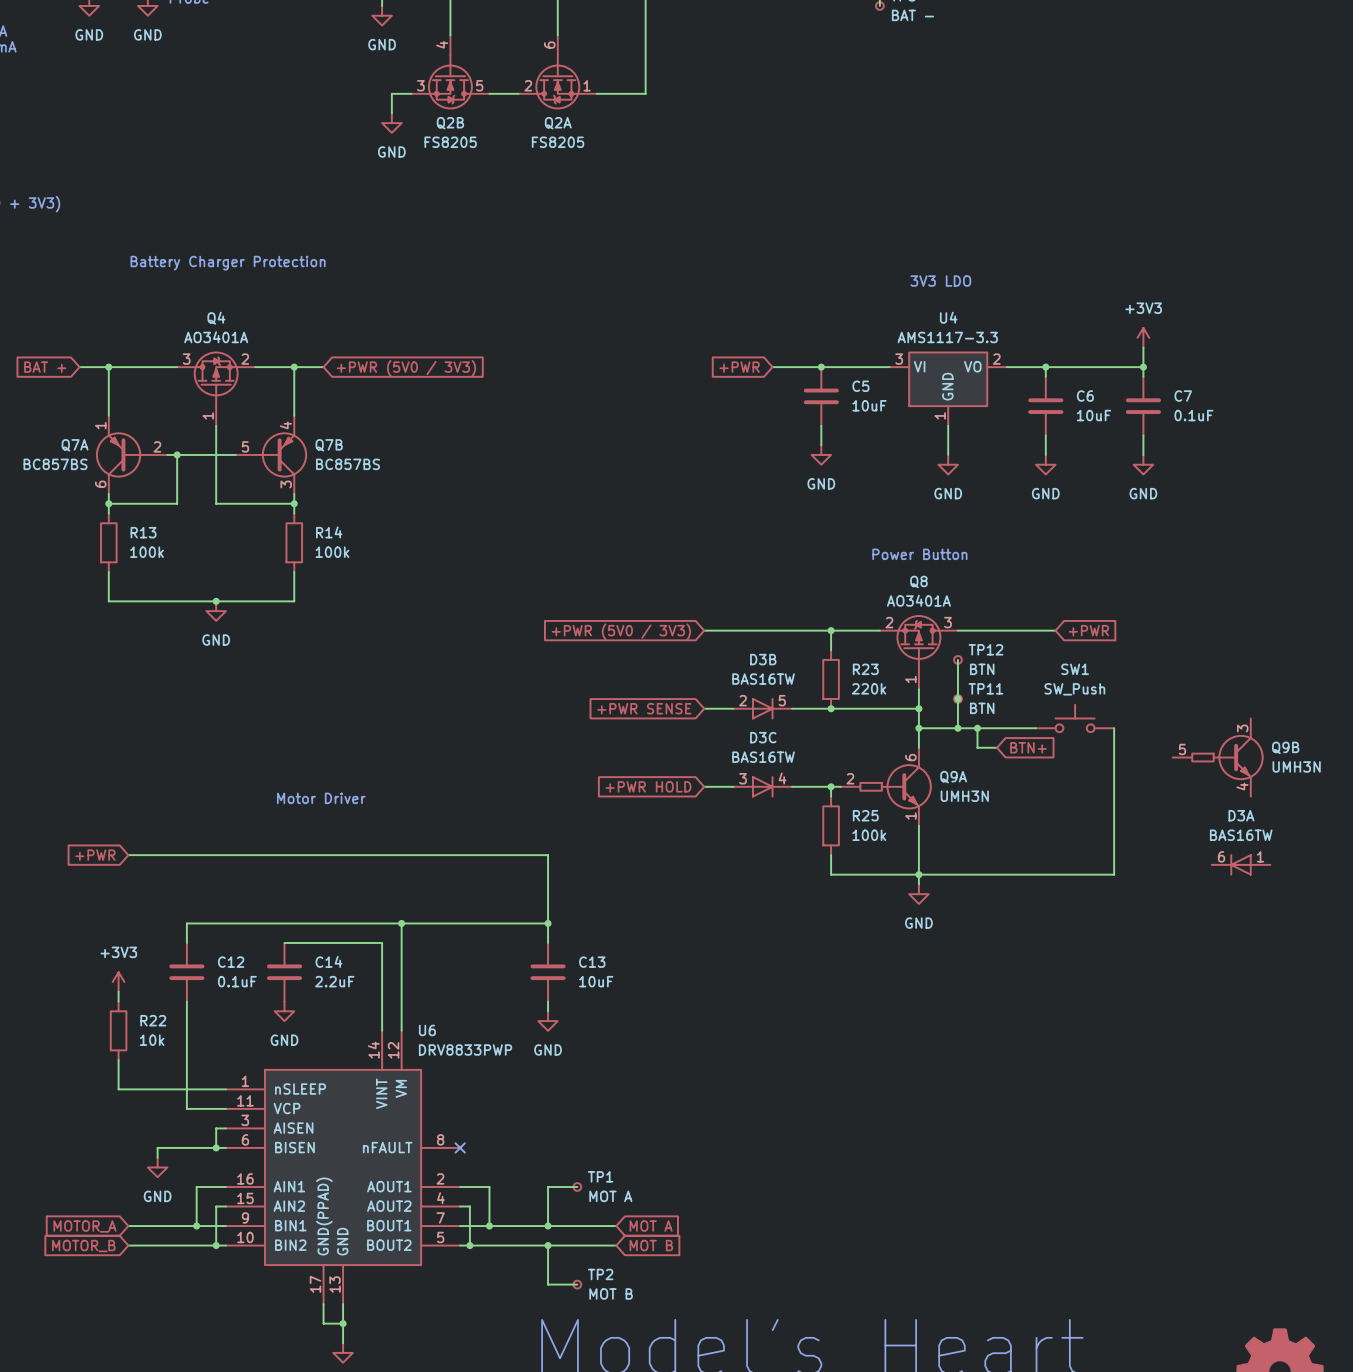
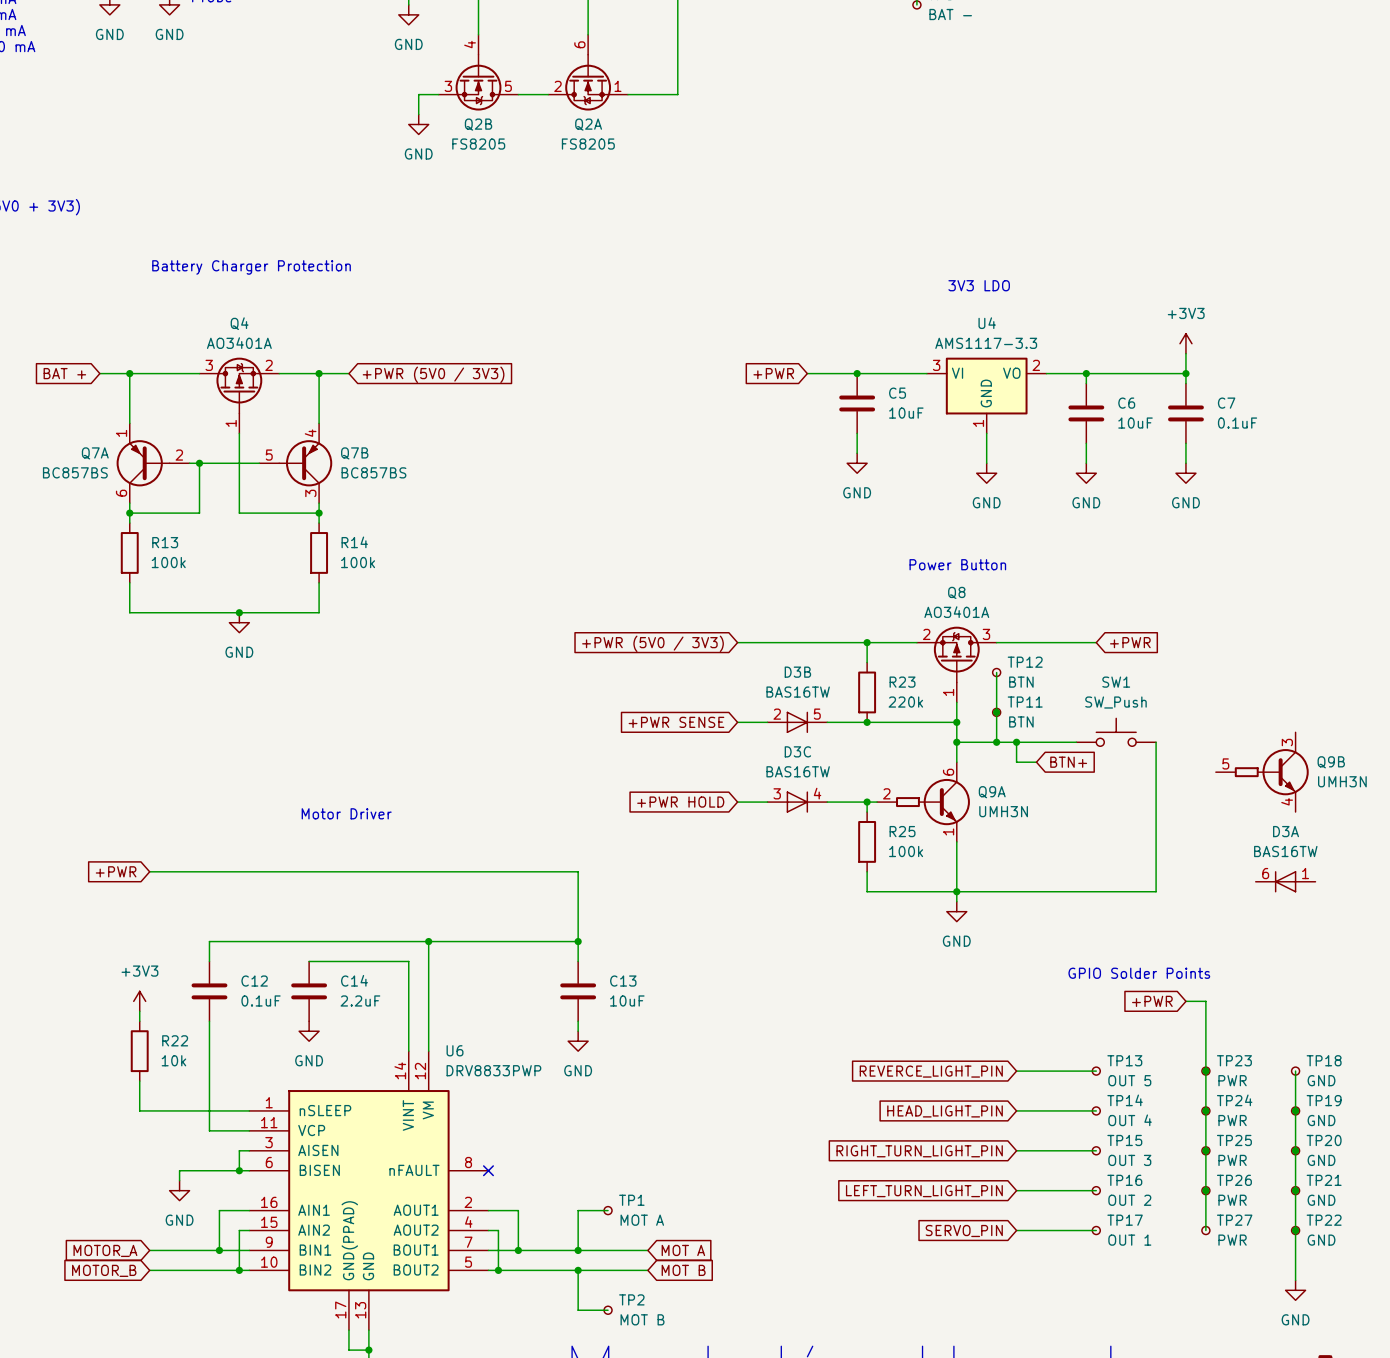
text: none -> GPIO Solder Points (1139, 973)
global label: none -> +PWR (1152, 1001)
wire: none -> (1185, 1001) (1205, 1001) (1205, 1230)
global label: none -> REVERCE_LIGHT_PIN (931, 1071)
wire: none -> (1016, 1071) (1096, 1071)
TP13: none -> OUT 5 (1096, 1071)
junction: none -> (1205, 1071)
TP23: none -> PWR (1205, 1071)
wire: none -> (1295, 1071) (1295, 1280)
TP18: none -> GND (1295, 1071)
global label: none -> HEAD_LIGHT_PIN (945, 1111)
wire: none -> (1016, 1110) (1096, 1110)
TP14: none -> OUT 4 (1096, 1110)
junction: none -> (1205, 1110)
TP24: none -> PWR (1205, 1110)
junction: none -> (1295, 1110)
TP19: none -> GND (1295, 1110)
global label: none -> RIGHT_TURN_LIGHT_PIN (919, 1151)
wire: none -> (1016, 1150) (1096, 1150)
TP15: none -> OUT 3 (1096, 1150)
junction: none -> (1205, 1150)
TP25: none -> PWR (1205, 1150)
junction: none -> (1295, 1150)
TP20: none -> GND (1295, 1150)
global label: none -> LEFT_TURN_LIGHT_PIN (924, 1191)
wire: none -> (1016, 1190) (1096, 1190)
TP16: none -> OUT 2 (1096, 1190)
junction: none -> (1205, 1190)
TP26: none -> PWR (1205, 1190)
junction: none -> (1295, 1190)
TP21: none -> GND (1295, 1190)
global label: none -> SERVO_PIN (964, 1231)
wire: none -> (1016, 1230) (1096, 1230)
TP17: none -> OUT 1 (1096, 1230)
TP27: none -> PWR (1205, 1230)
junction: none -> (1295, 1230)
TP22: none -> GND (1295, 1230)
power symbol: none -> GND (1295, 1290)

